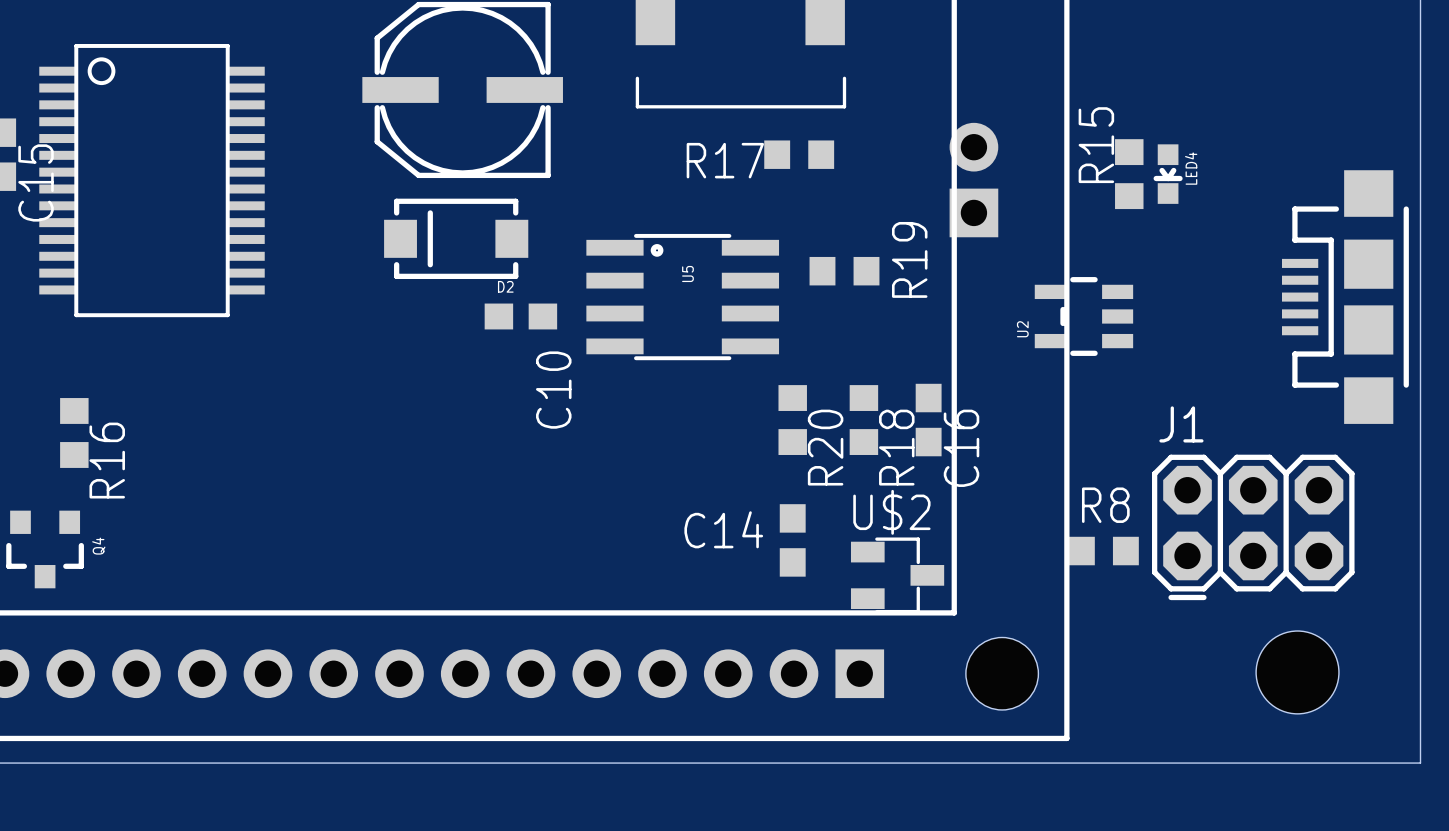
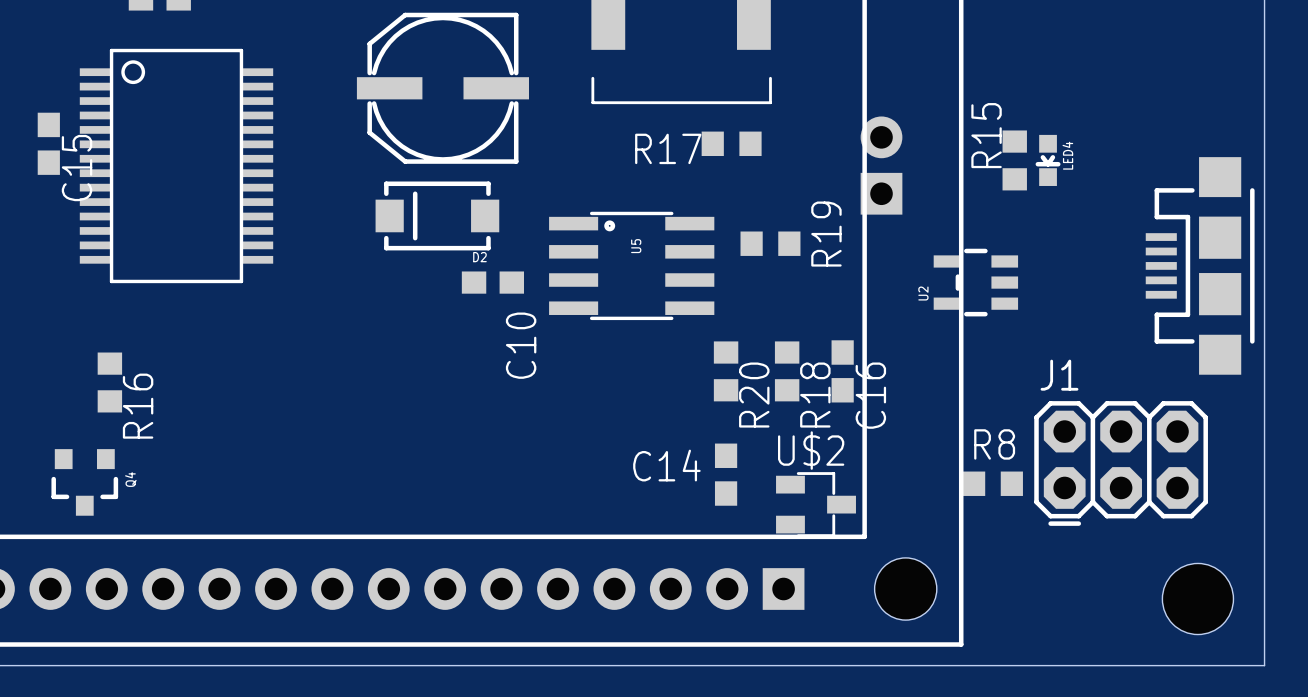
hole position: (1297, 672) -> (1197, 598)

